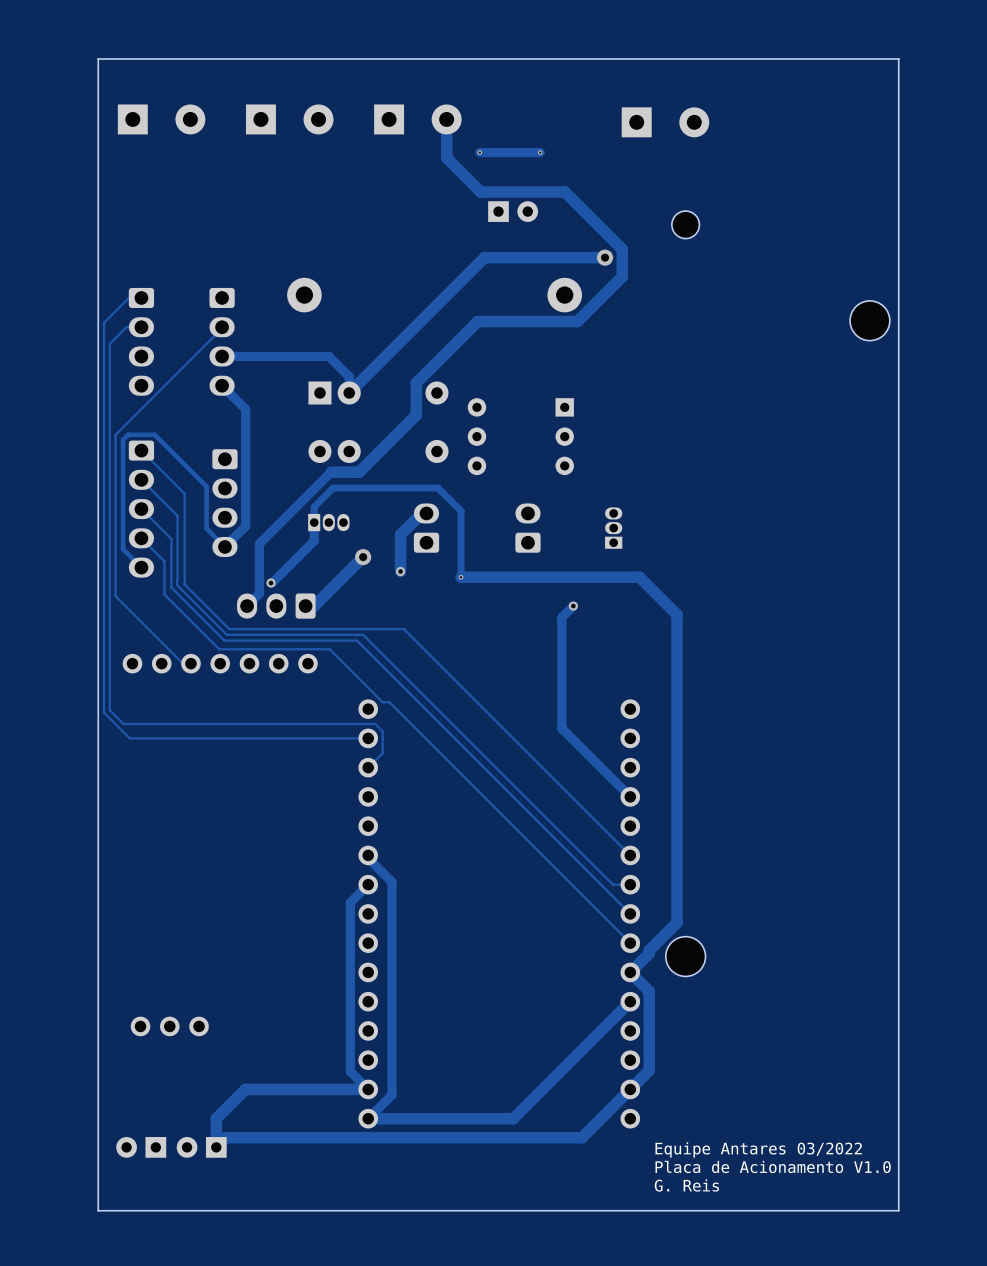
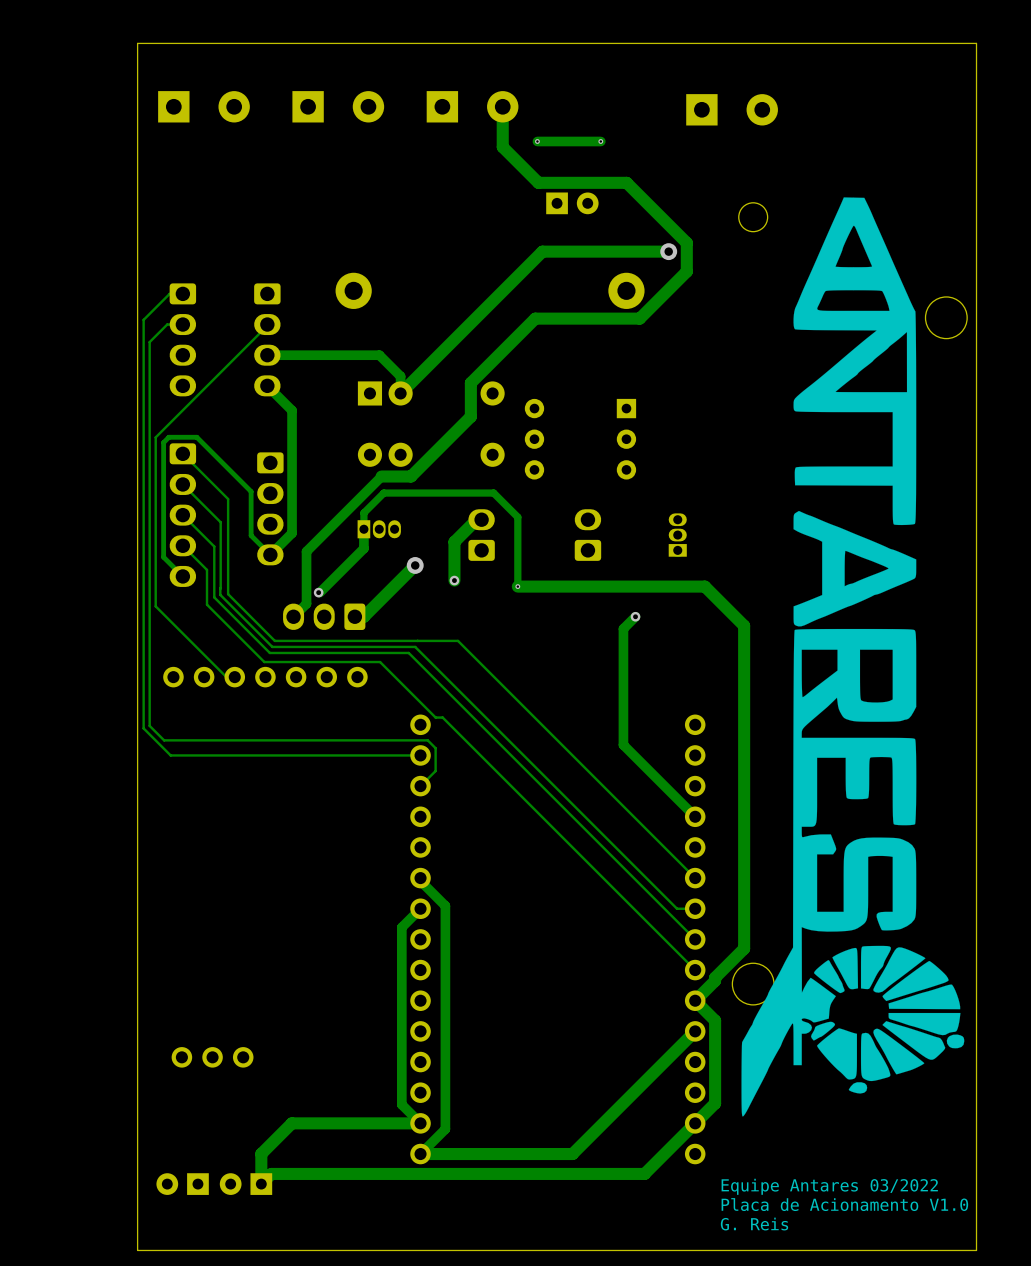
drawing: none -> [741, 197, 965, 1117]

